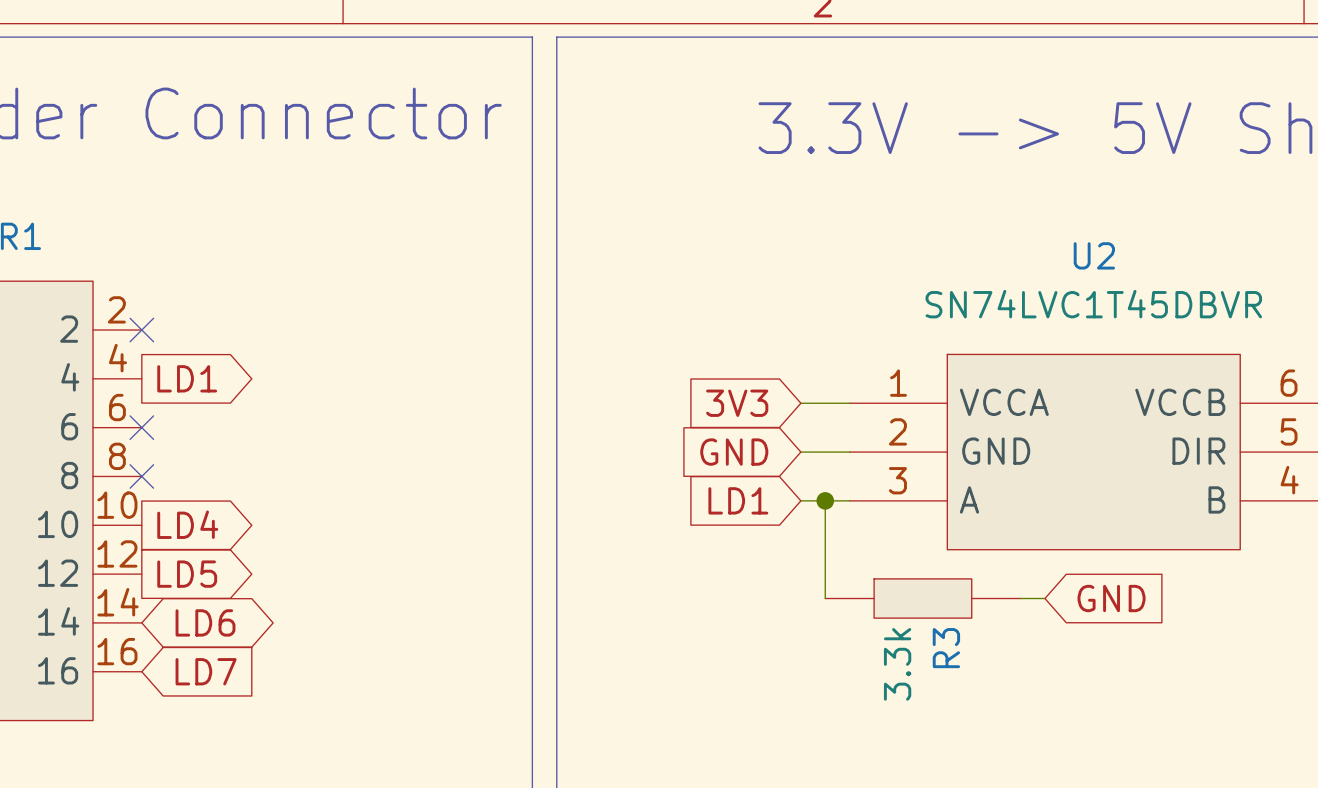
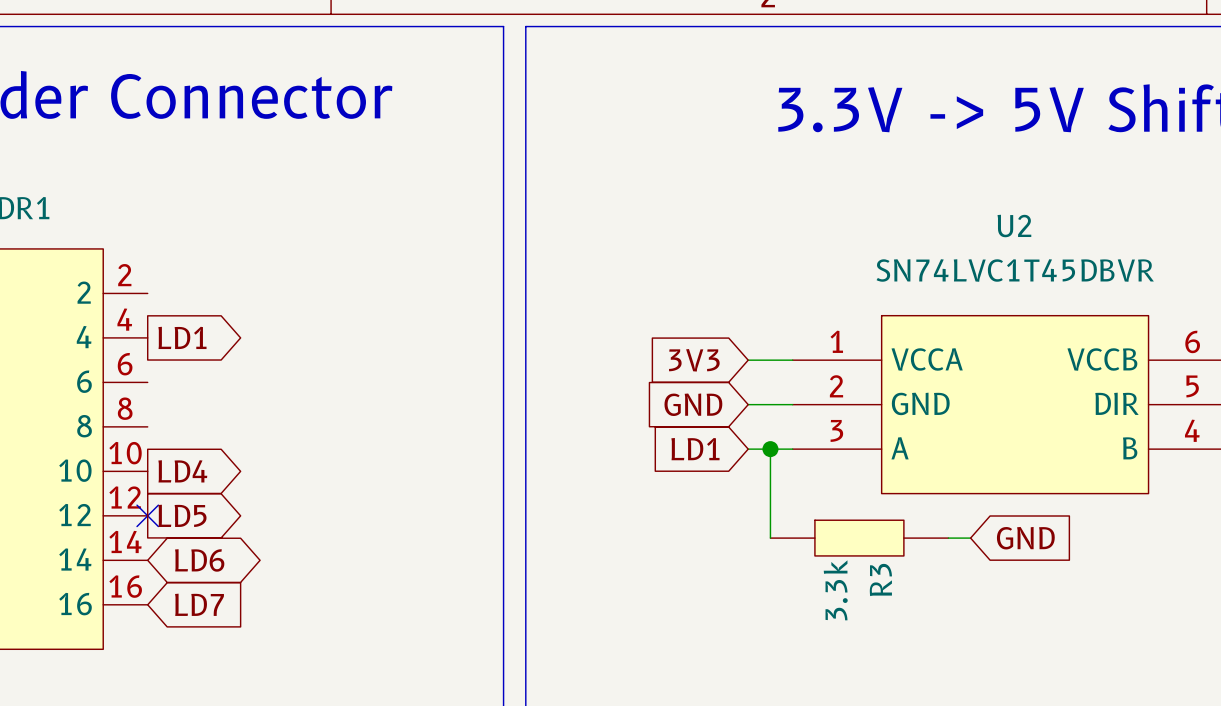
no-connect mark: (141, 330) -> none
no-connect mark: (141, 427) -> none
no-connect mark: (141, 476) -> none
no-connect mark: none -> (147, 515)

